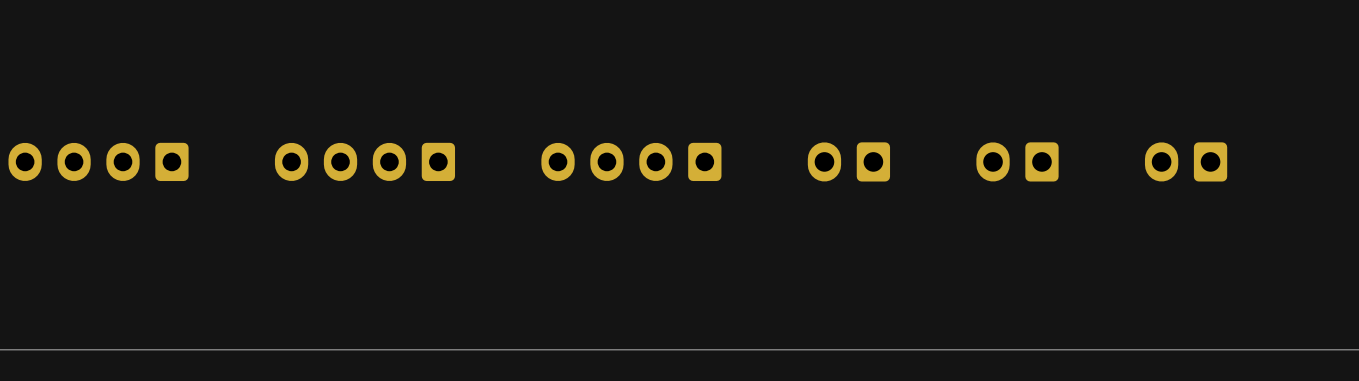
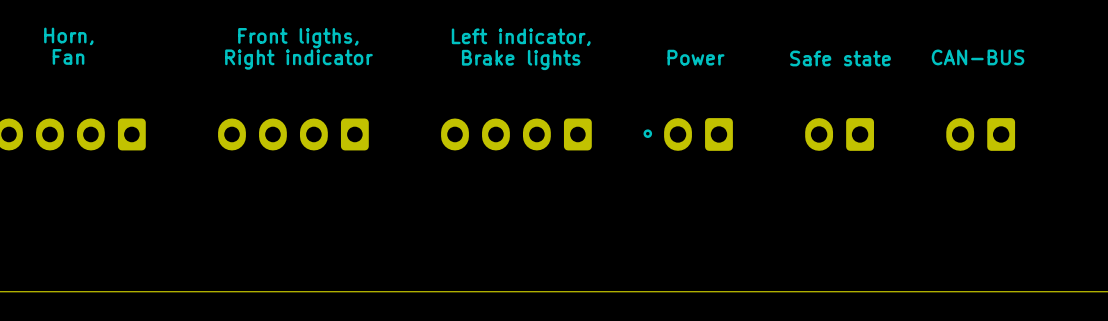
text: none -> Horn, (68, 36)
text: none -> Left indicator, (521, 37)
text: none -> Front ligths, (298, 38)
text: none -> Fan (68, 56)
text: none -> CAN-BUS (978, 57)
text: none -> Power (695, 57)
text: none -> Safe state (840, 58)
text: none -> Right indicator (298, 59)
text: none -> Brake lights (521, 59)
drawing: none -> [643, 129, 653, 138]

